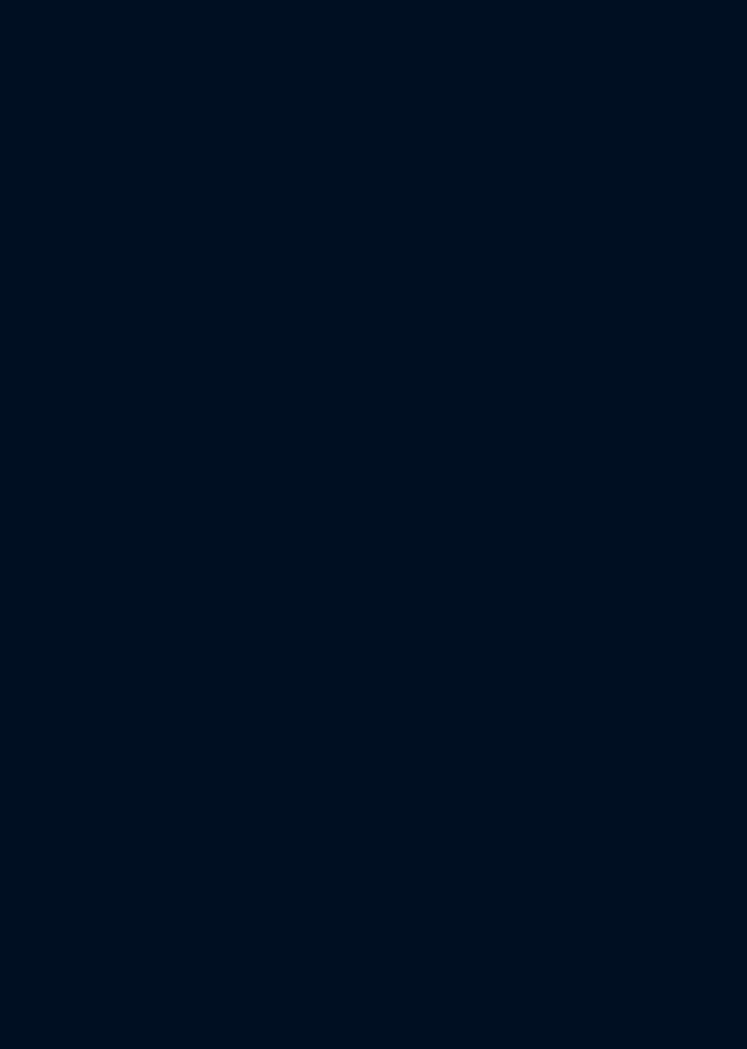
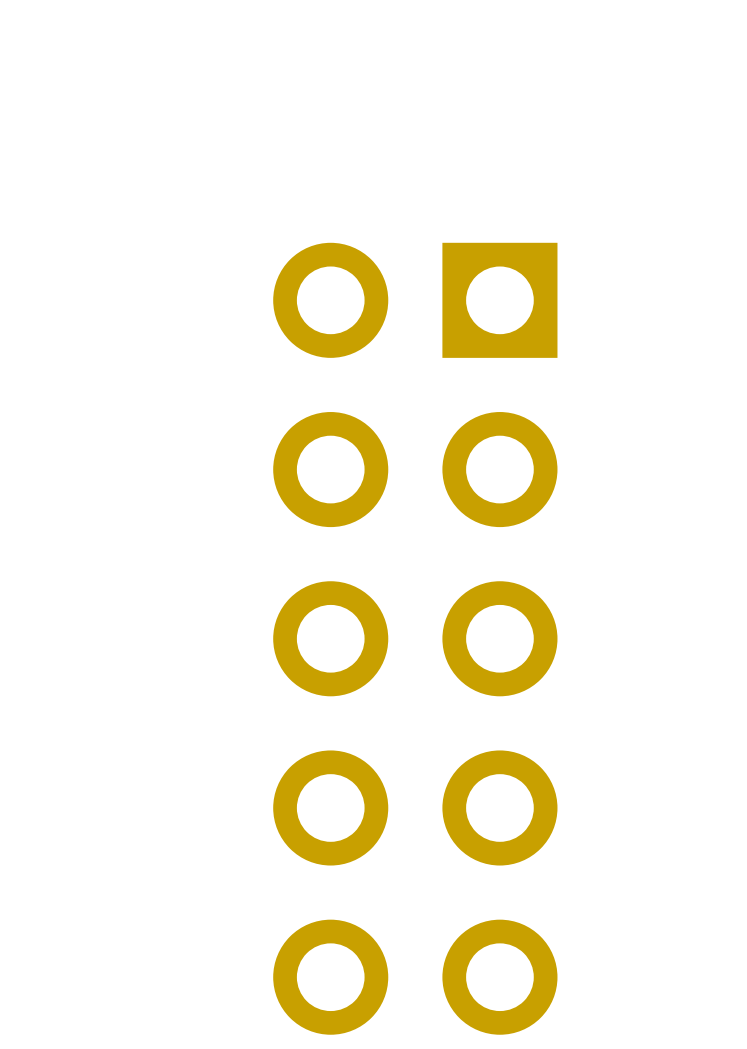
part: none -> (415, 638)

